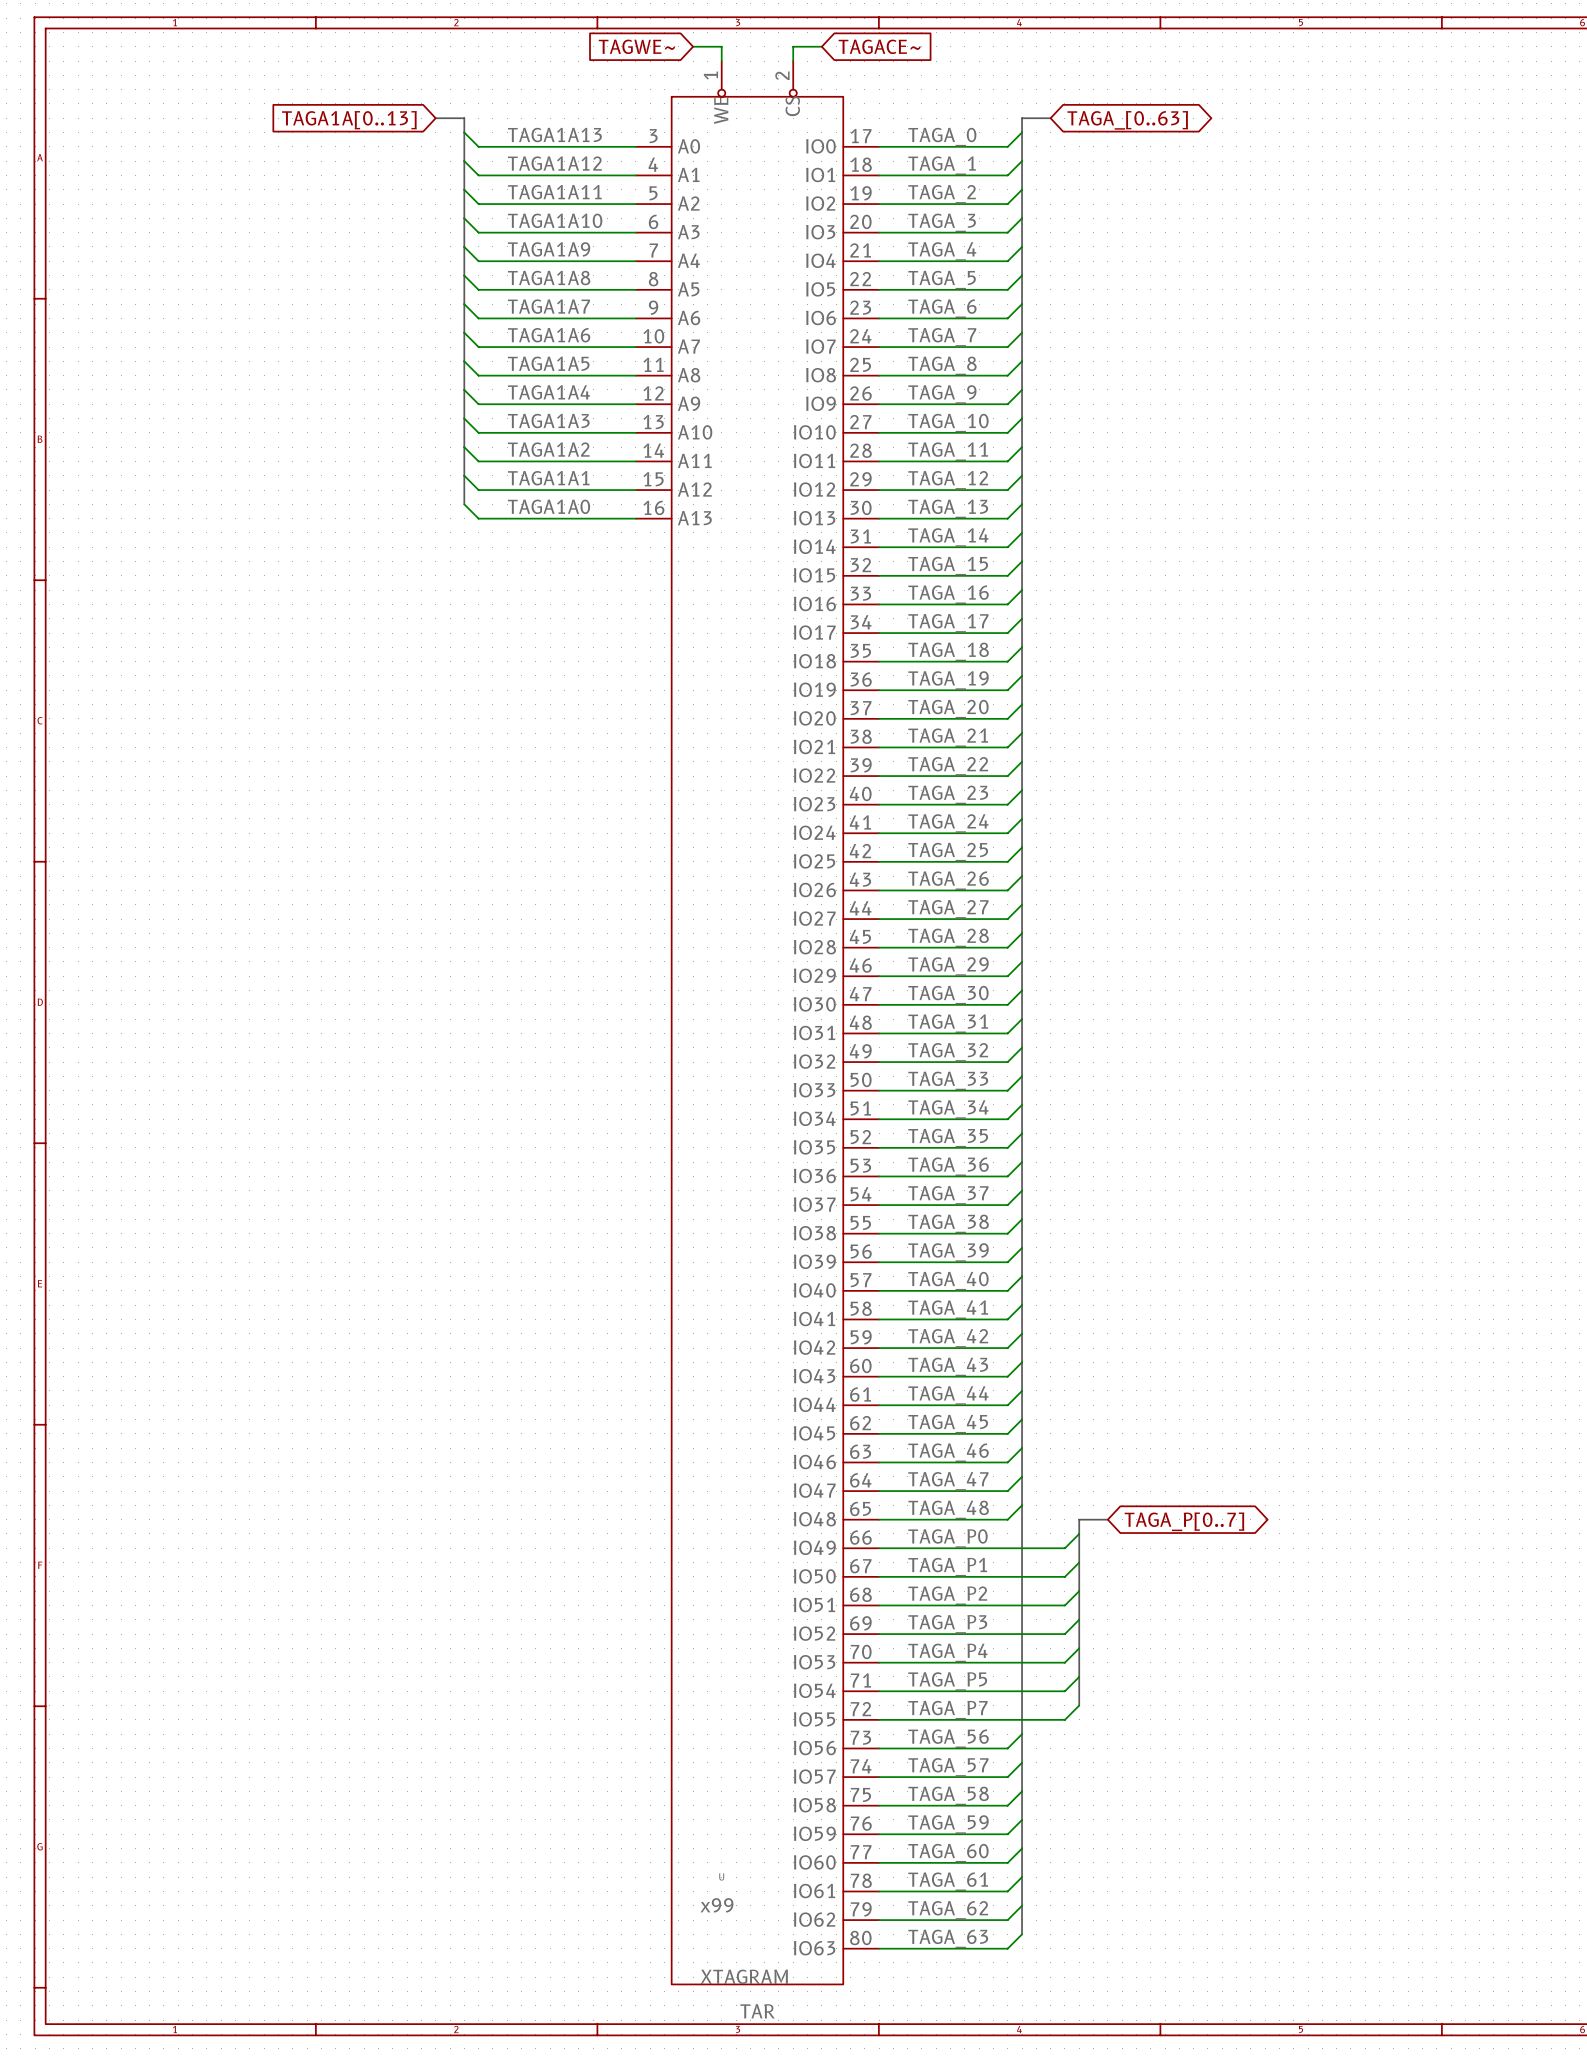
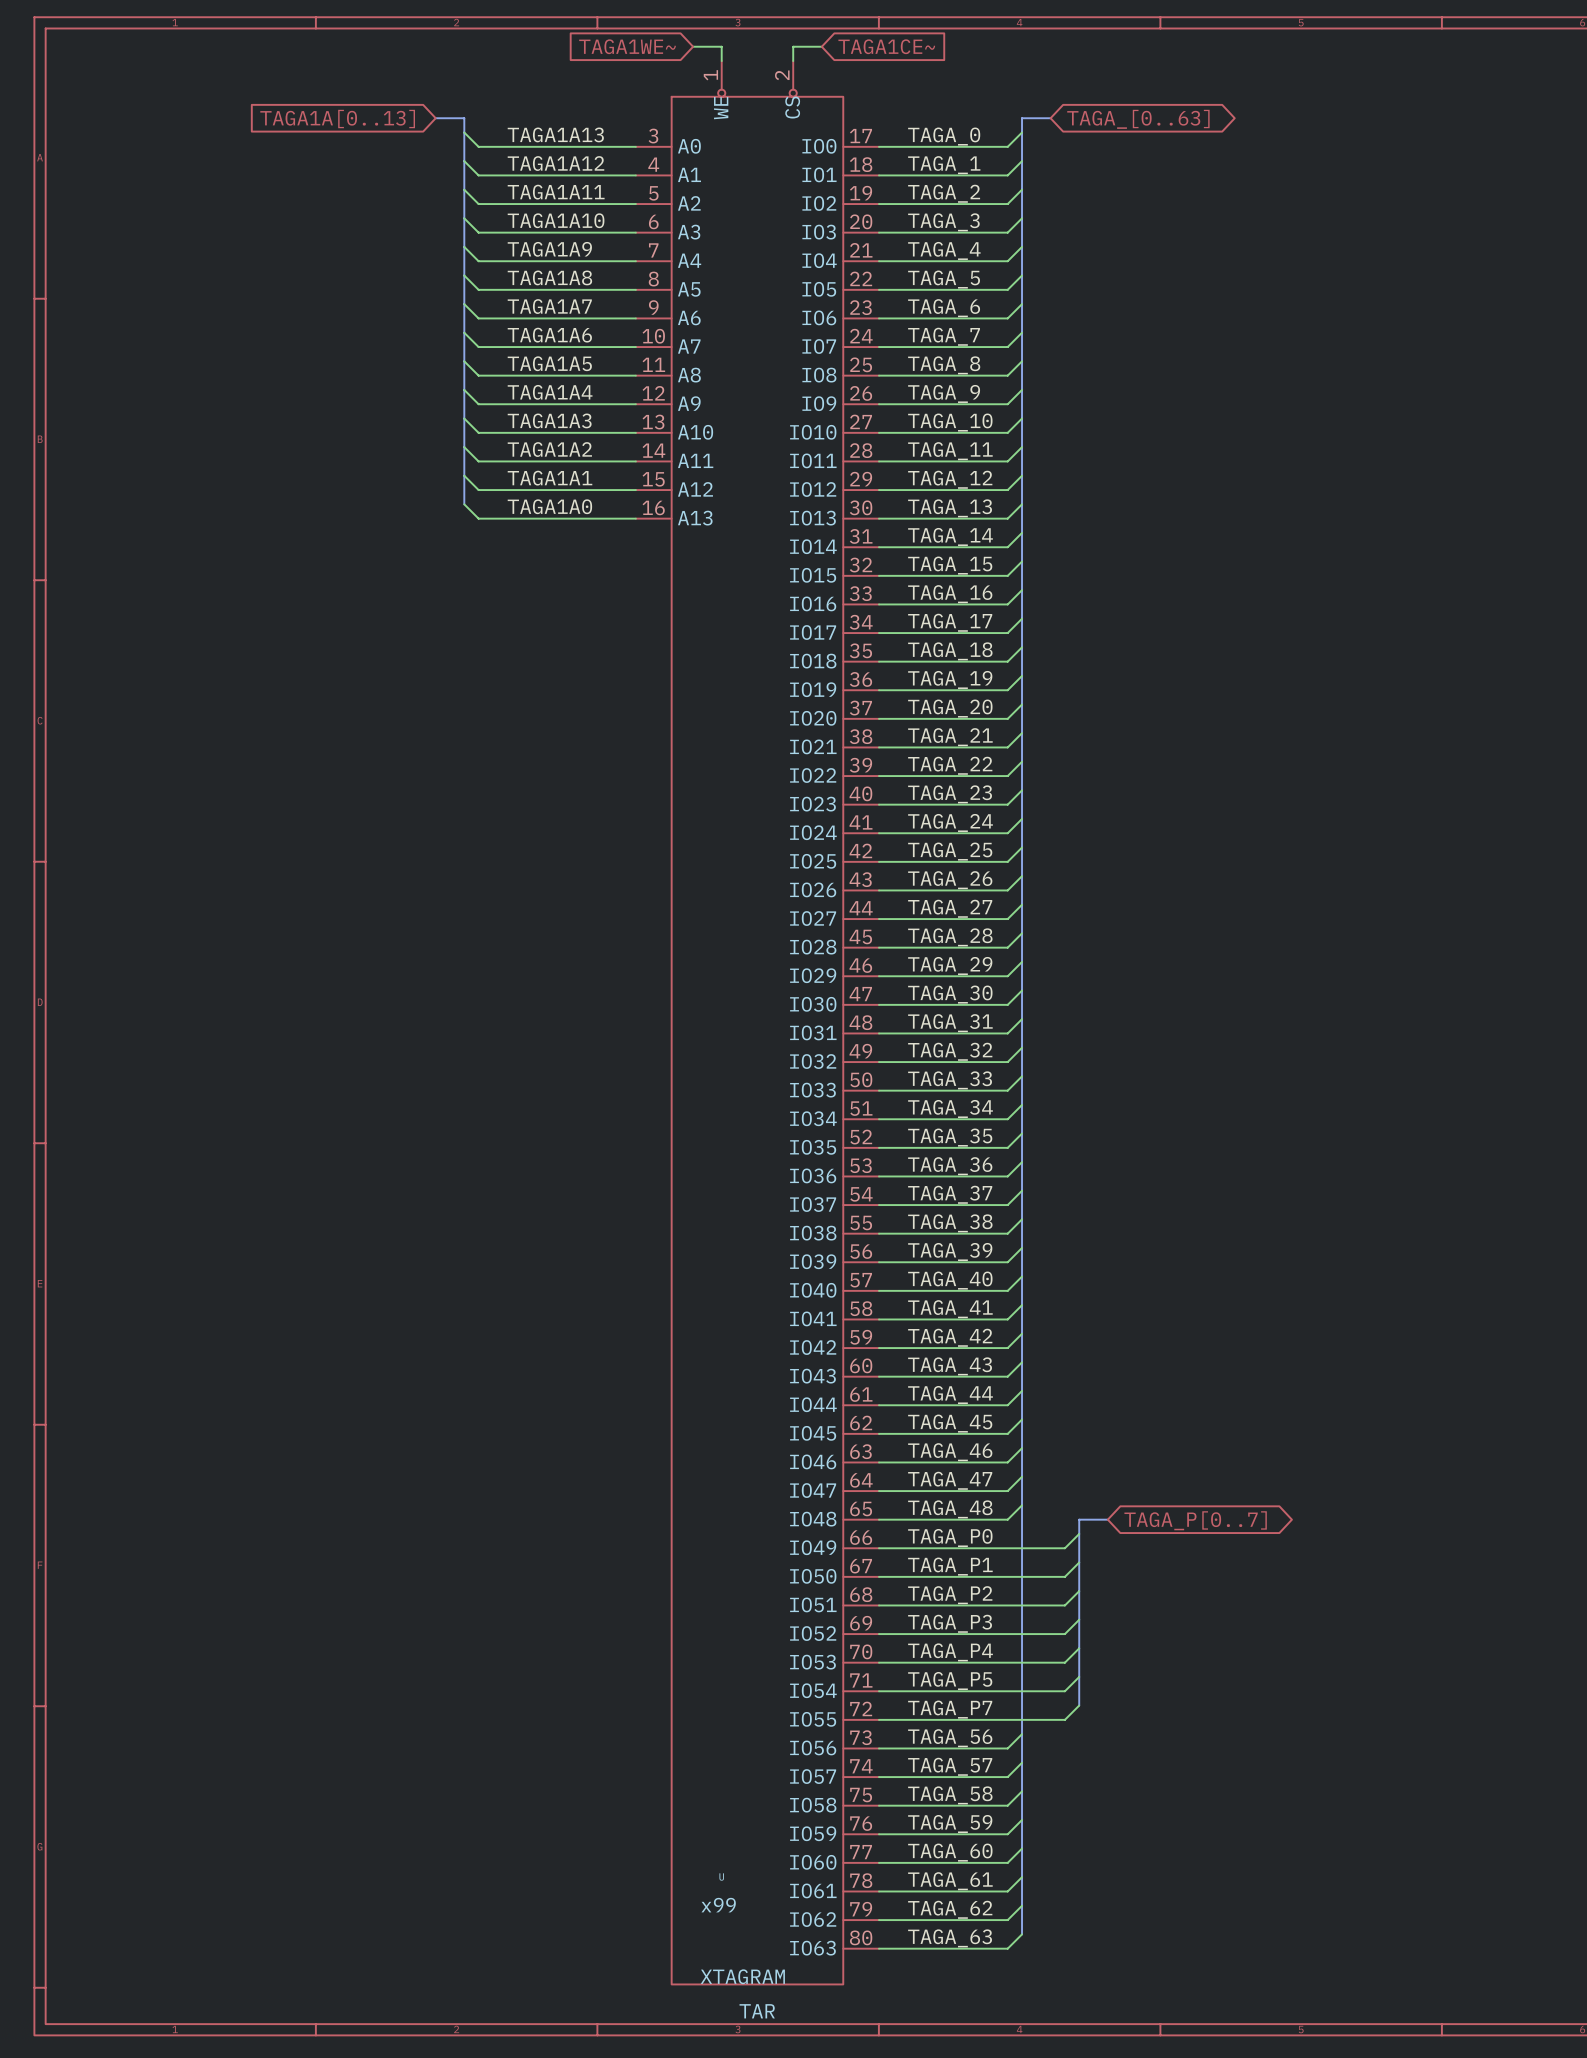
global label: TAGWE~ (636, 46) -> TAGA1WE~ (627, 46)
global label: TAGACE~ (879, 46) -> TAGA1CE~ (886, 46)

